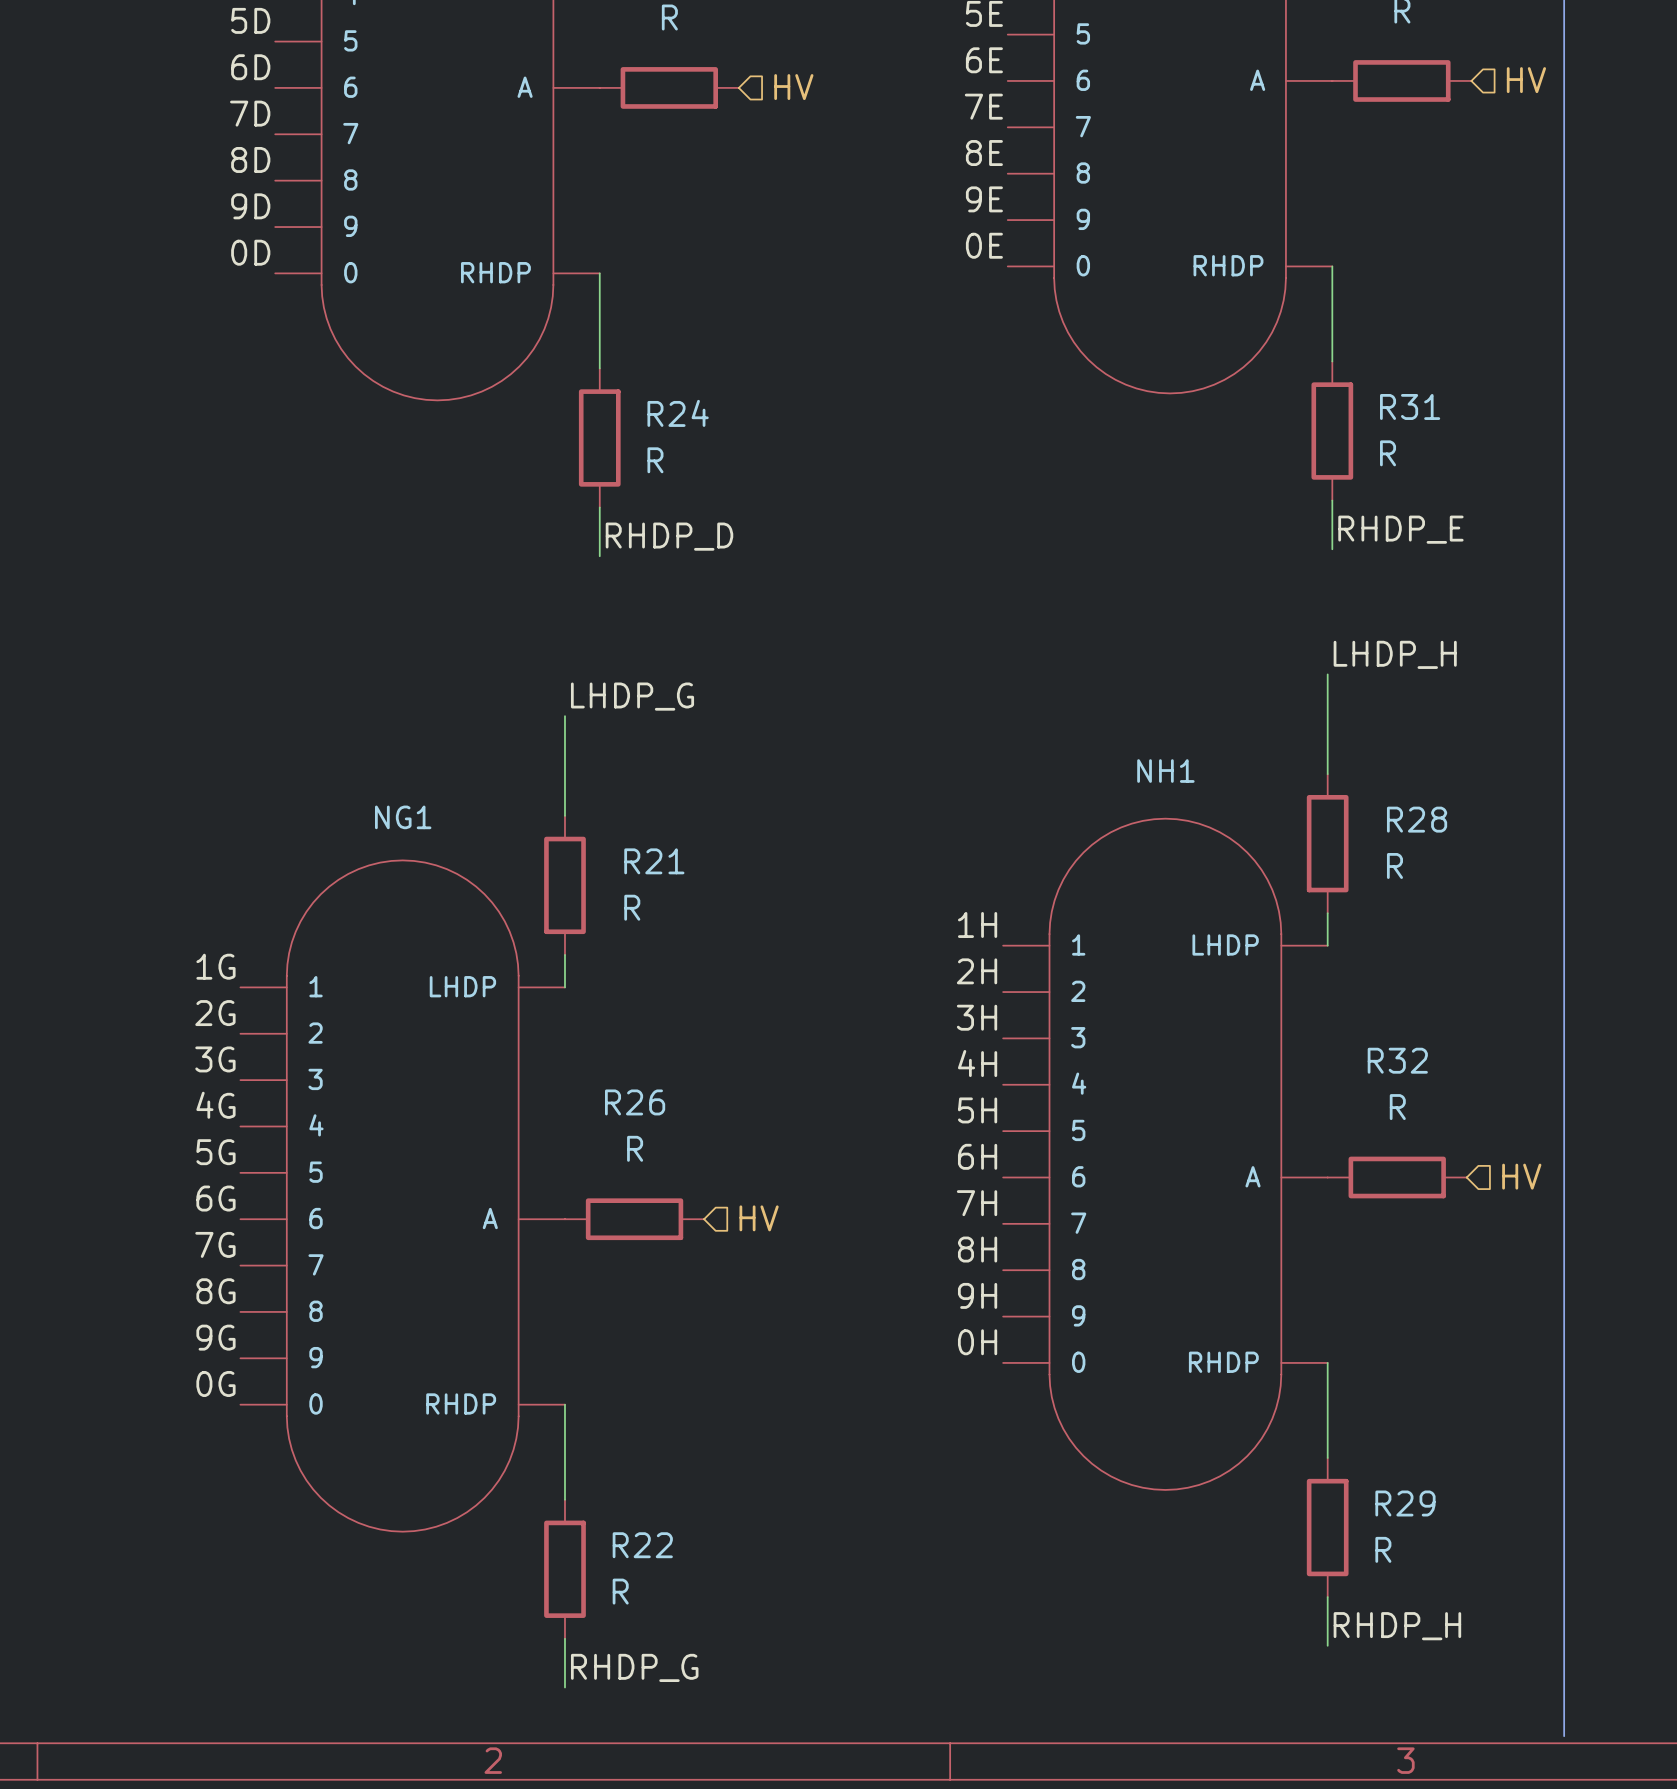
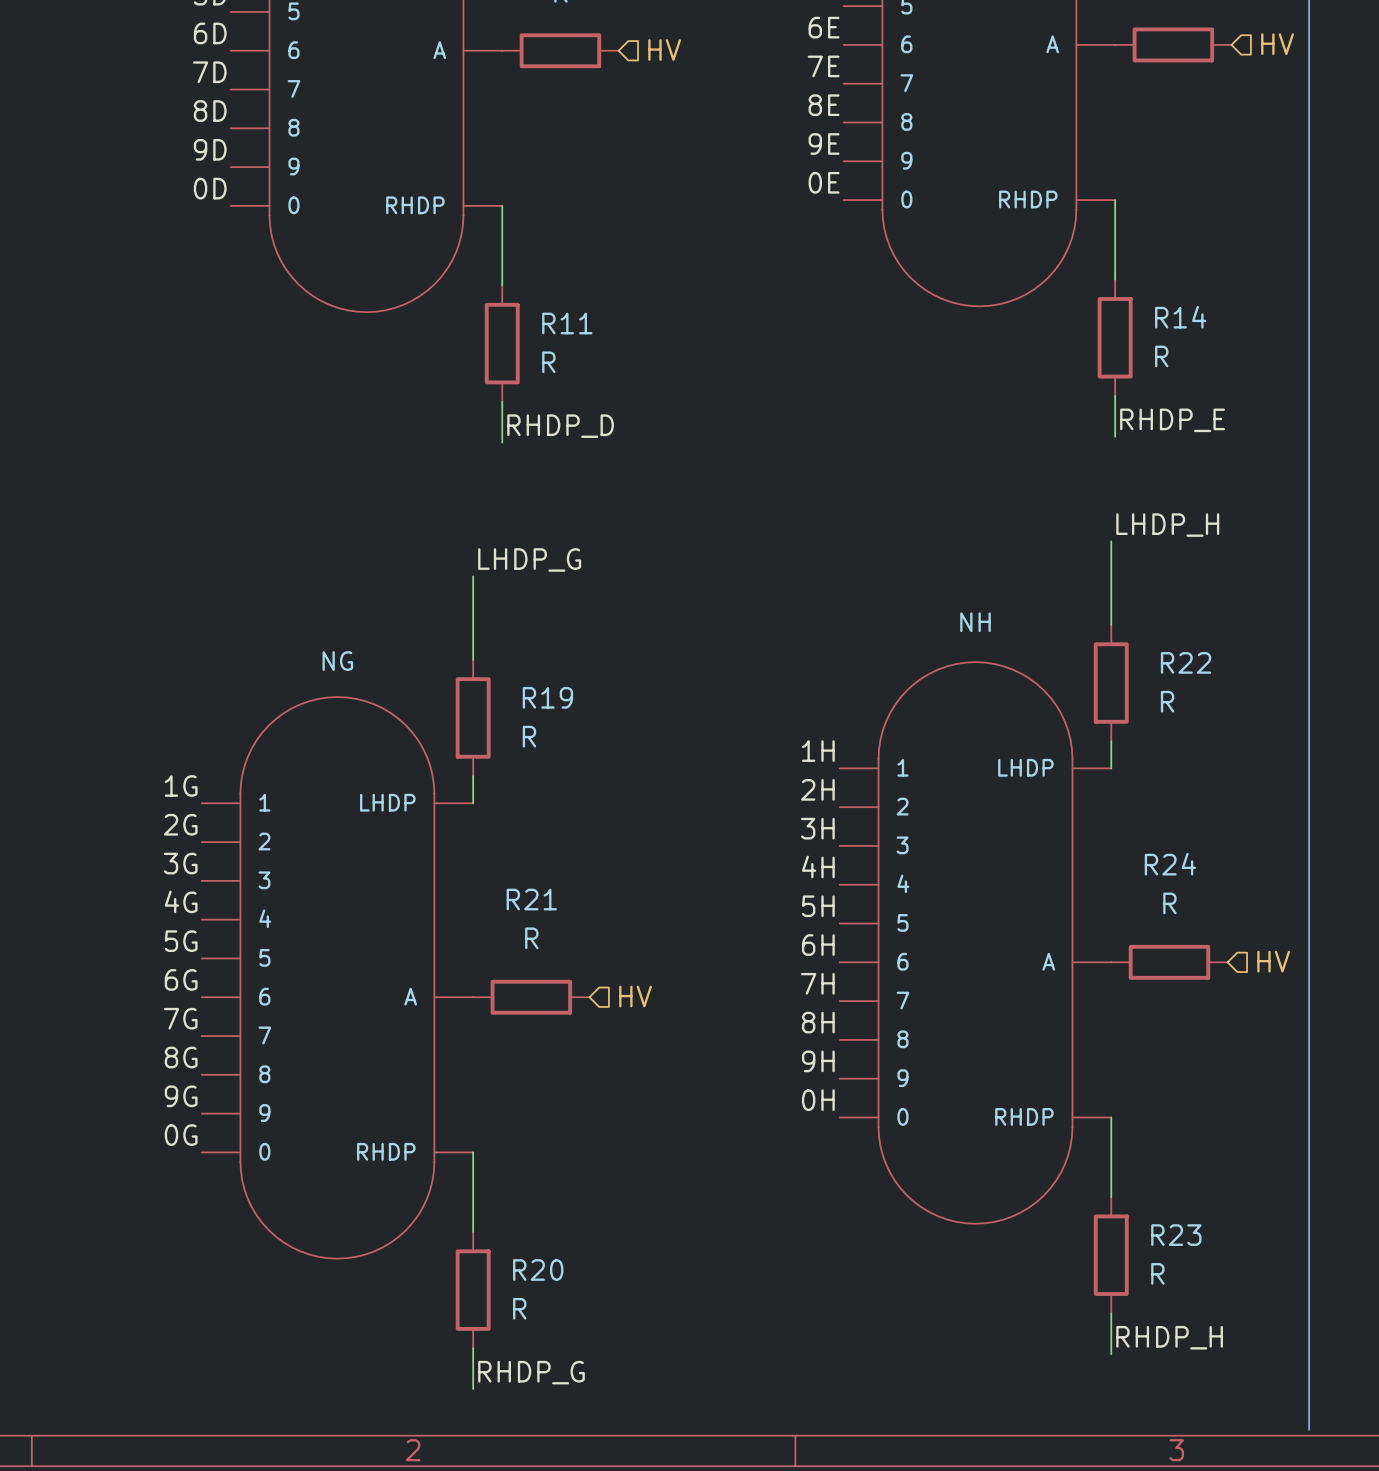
R31 name: R31 (1410, 406) -> R14 (1180, 317)
R24 name: R24 (678, 413) -> R11 (567, 323)
NH1 name: NH1 (1165, 771) -> NH (975, 622)
NG1 name: NG1 (403, 817) -> NG (337, 661)
R28 name: R28 (1417, 819) -> R22 (1186, 662)
R21 name: R21 (654, 861) -> R19 (547, 697)
R32 name: R32 (1397, 1060) -> R24 (1170, 864)
R26 name: R26 (635, 1102) -> R21 (531, 899)
R29 name: R29 (1405, 1503) -> R23 (1176, 1235)
R22 name: R22 (642, 1545) -> R20 (538, 1269)

